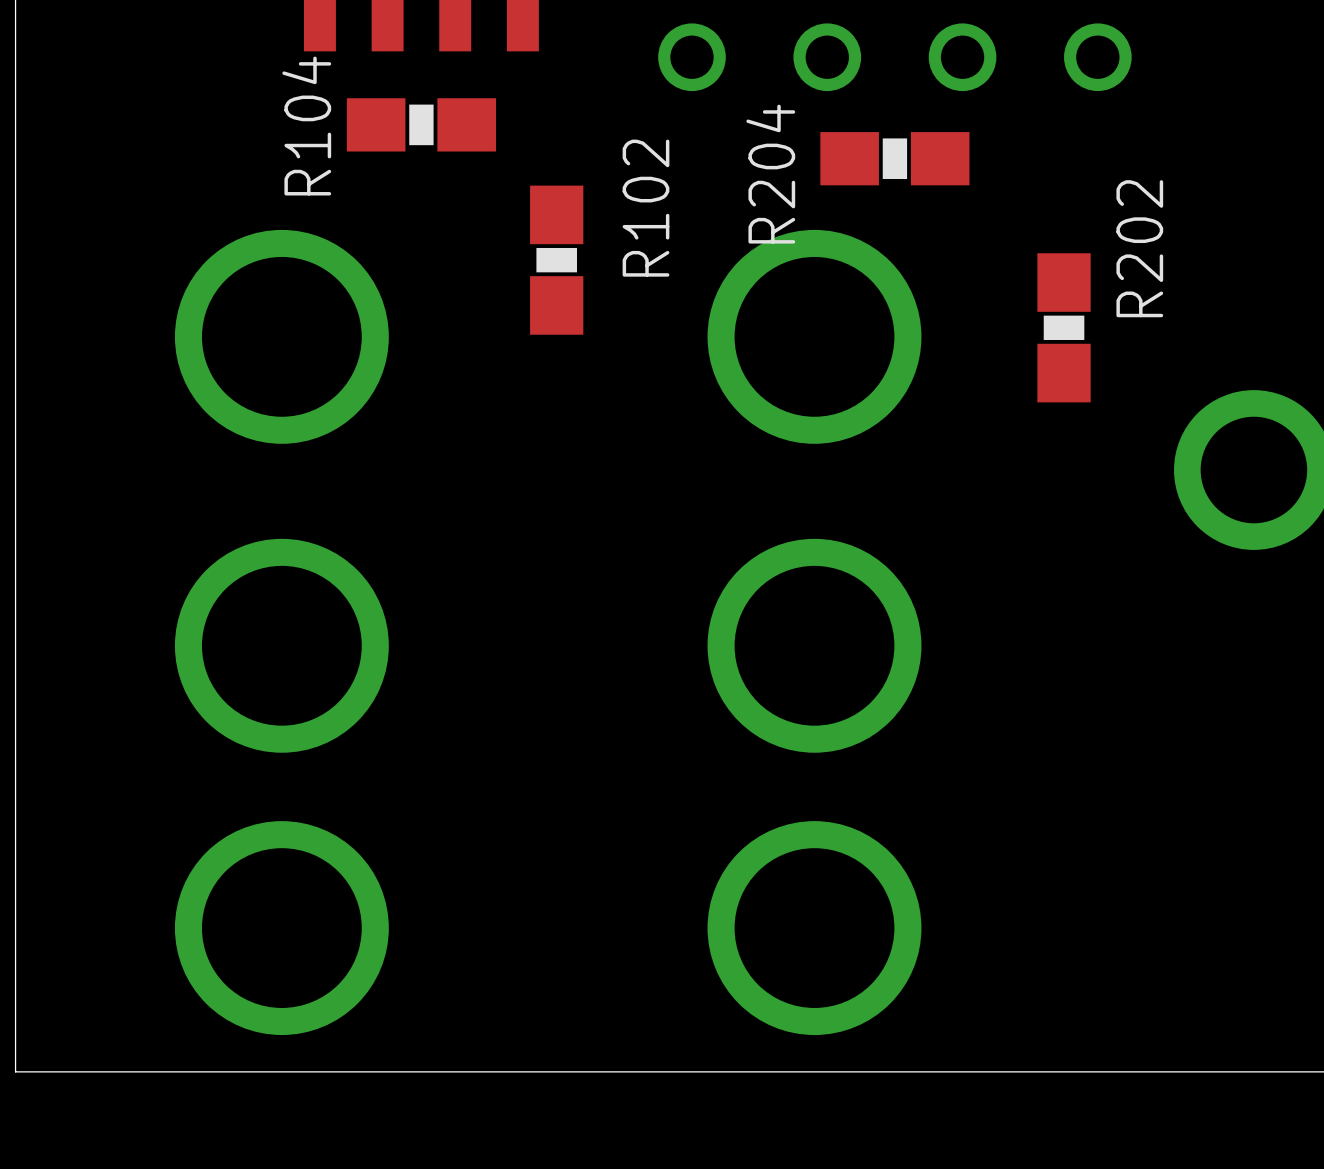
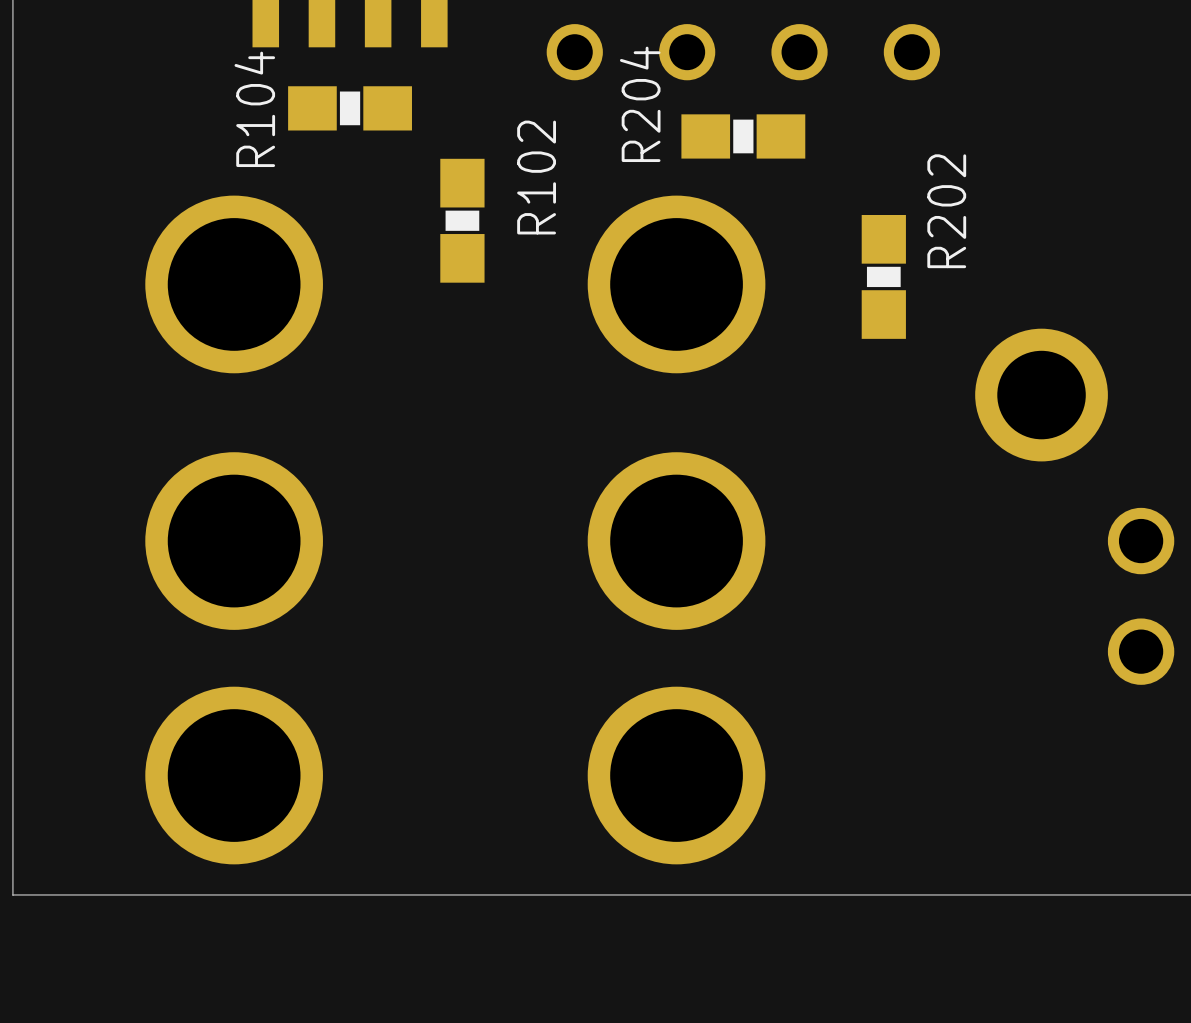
R204 name position: R204 (770, 174) -> R204 (640, 104)

